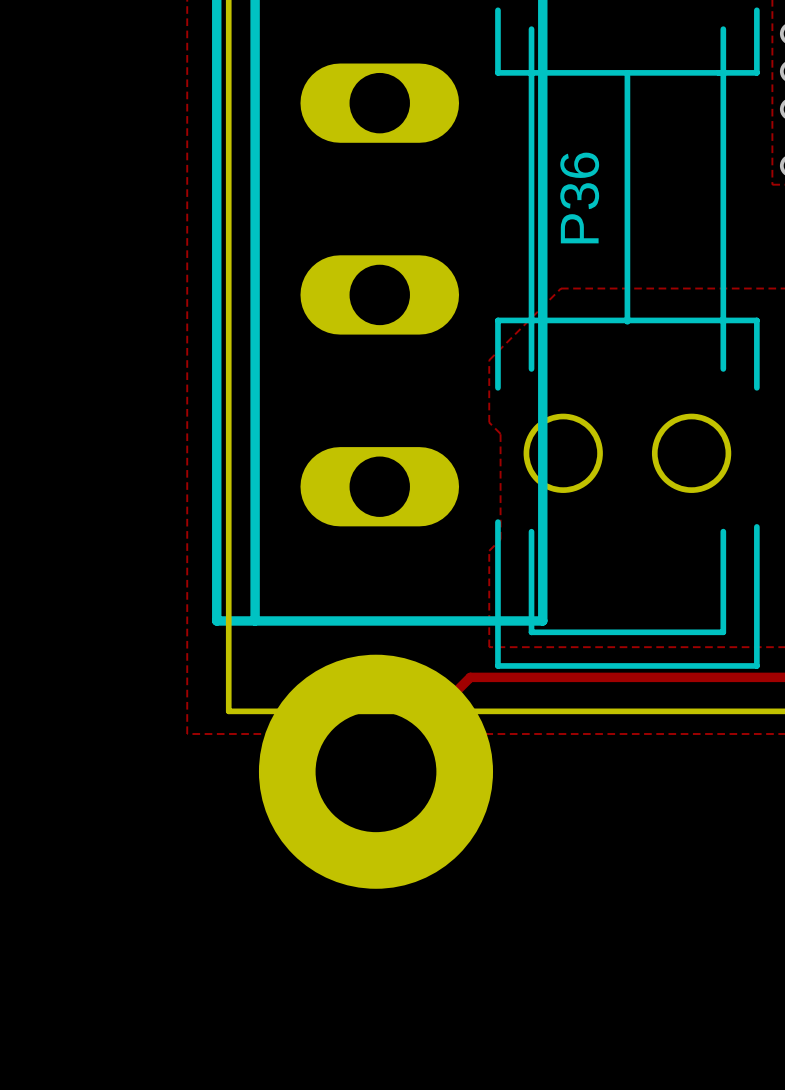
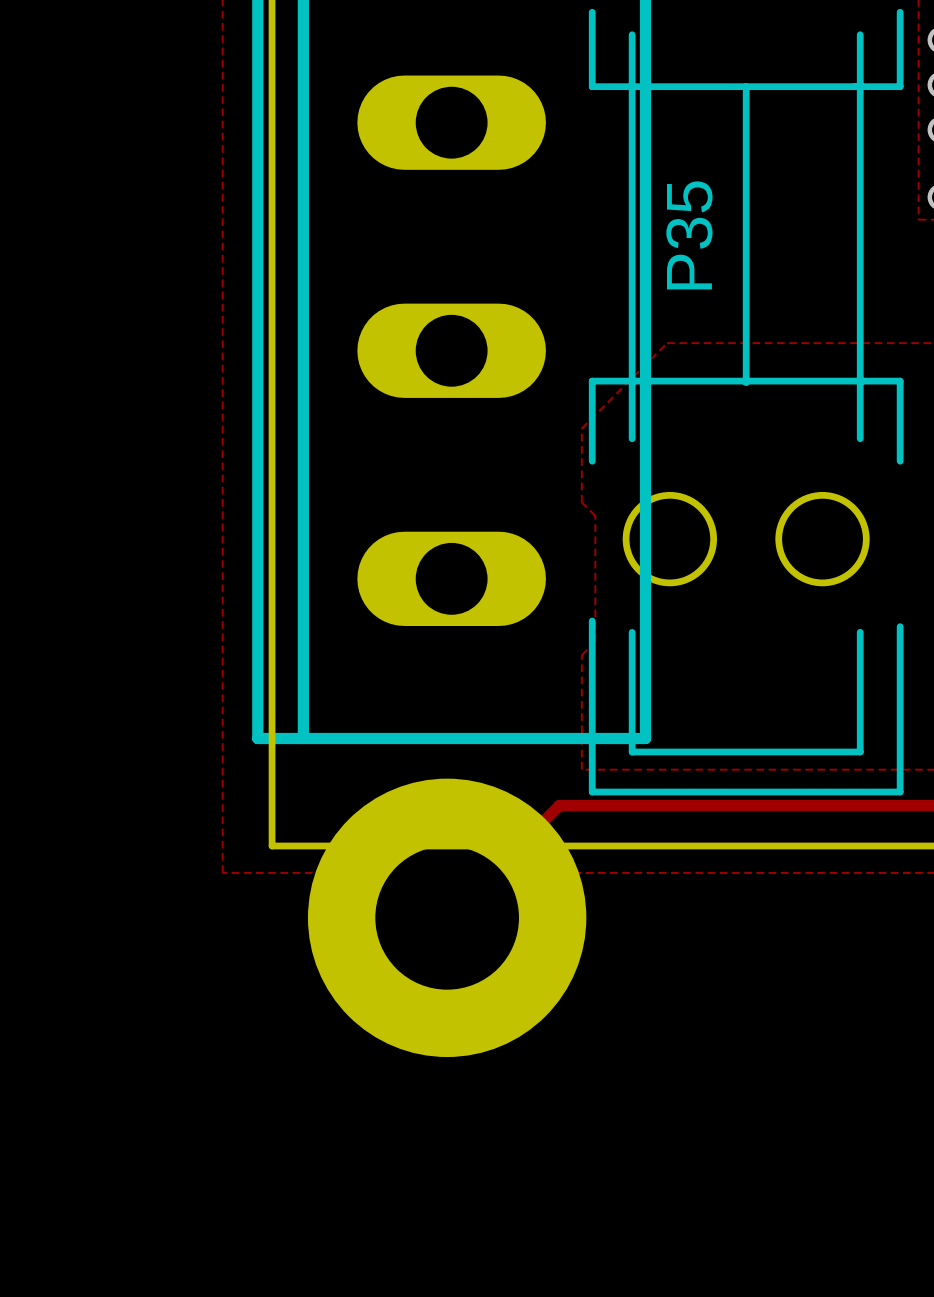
P36 name: P36 (579, 198) -> P35 (689, 235)

